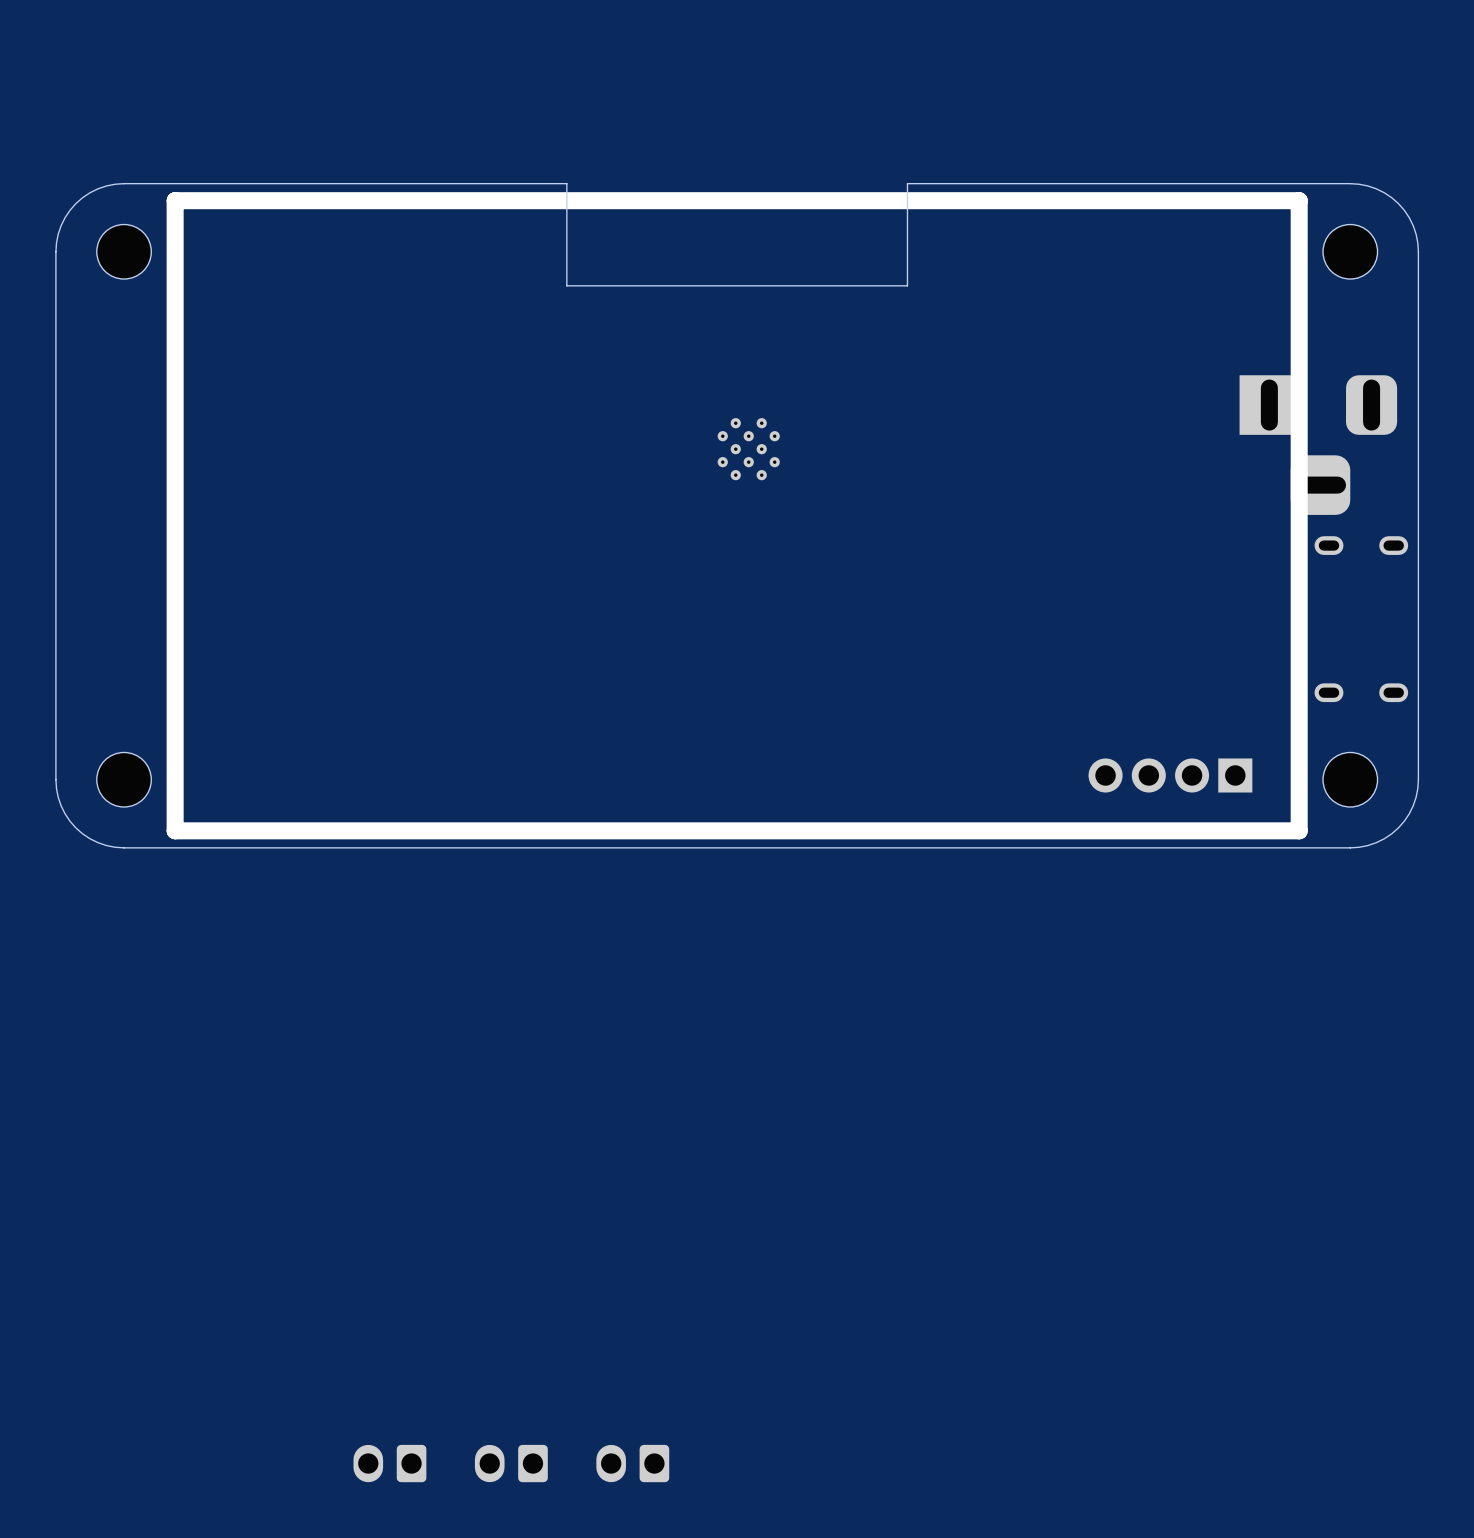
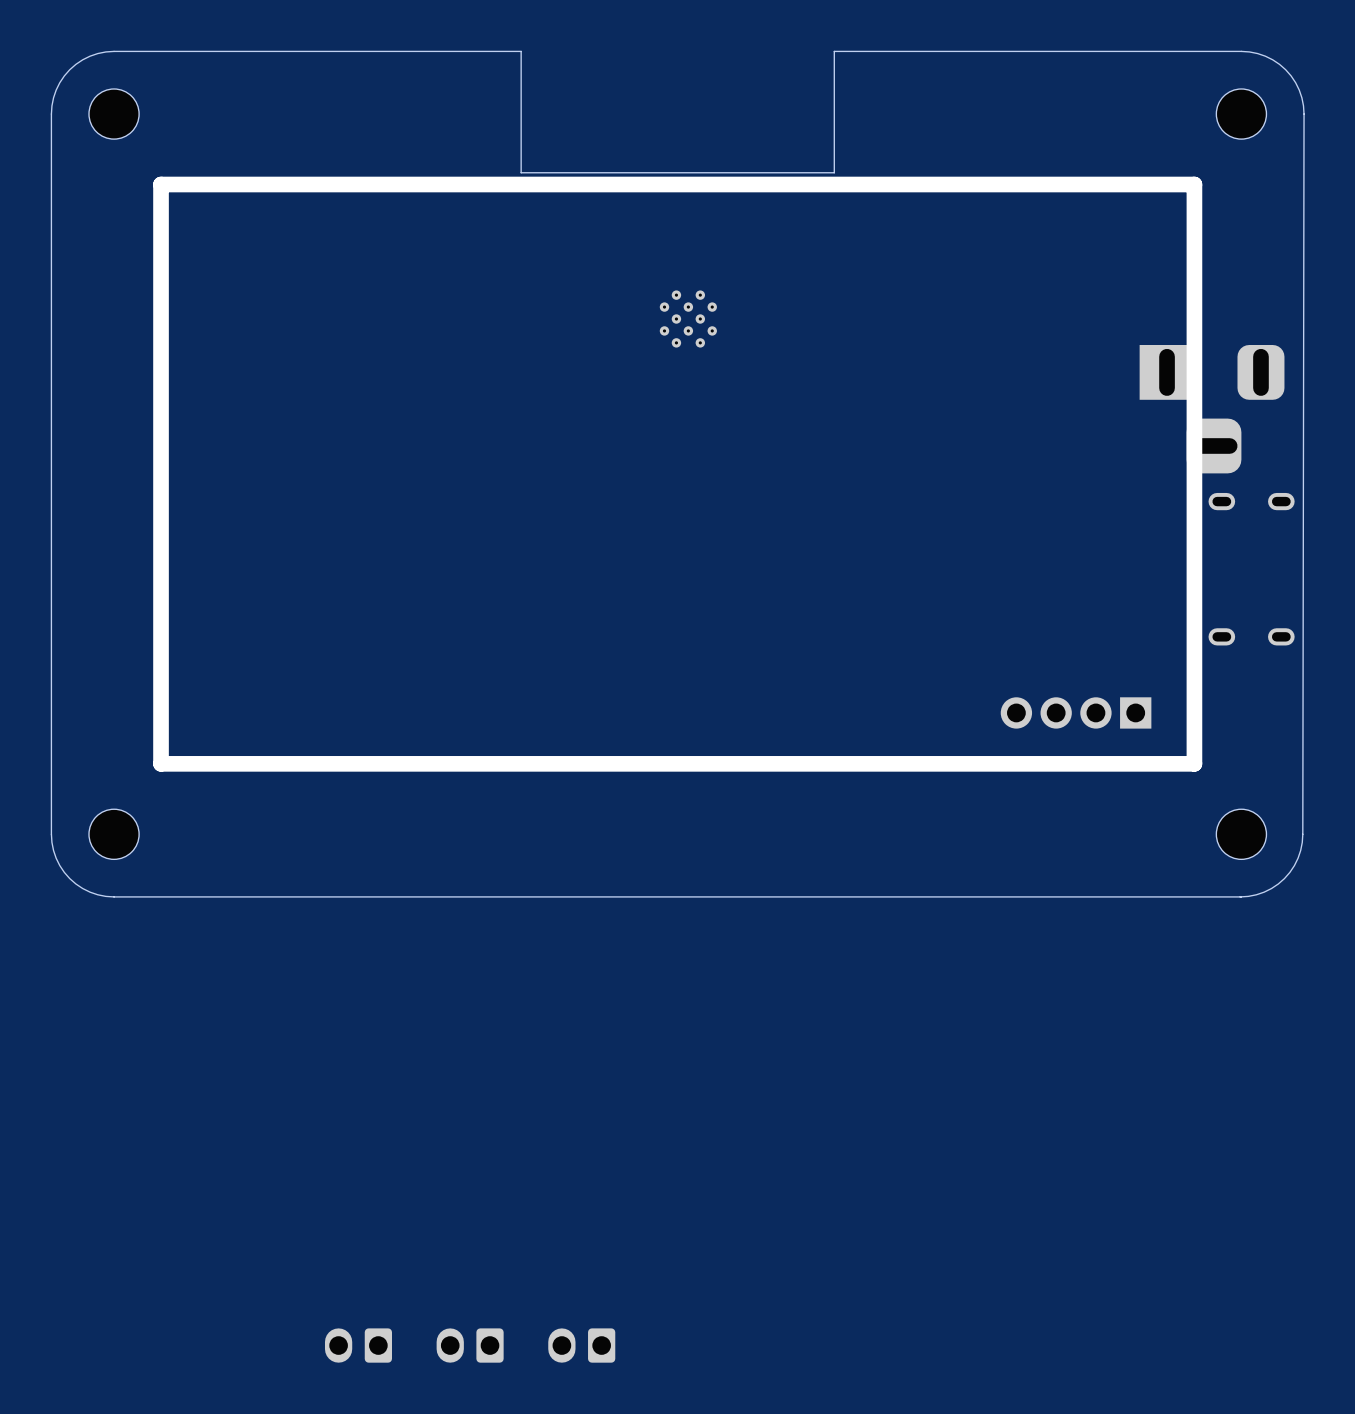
board edge: (566, 183) (115, 184) (89, 192) (70, 210) (58, 234) (55, 251) -> (521, 168) (521, 51) (105, 51) (82, 59) (69, 69) (59, 82) (53, 97) (51, 114) (51, 231)
board edge: (907, 183) (1350, 183) (1367, 185) (1384, 192) (1404, 210) (1413, 225) (1418, 251) (1418, 779) (1413, 805) (1404, 821) (1391, 833) (1376, 842) (1350, 847) (124, 847) (97, 842) (75, 827) (61, 805) (55, 779) -> (1241, 896) (105, 896) (90, 892) (75, 883) (59, 865) (53, 850) (51, 834) (51, 716)
board edge: none -> (834, 168) (834, 51) (1249, 51) (1265, 56) (1279, 64) (1295, 82) (1301, 97) (1304, 114) (1302, 842) (1294, 865) (1278, 883) (1264, 892) (1240, 896)
board edge: (907, 187) (907, 285) (566, 285) (566, 187) -> (834, 172) (521, 172)
part position: (124, 251) -> (114, 114)
part position: (1350, 251) -> (1241, 114)
part position: (748, 449) -> (688, 319)
part position: (124, 779) -> (114, 834)
part position: (1350, 779) -> (1241, 834)

